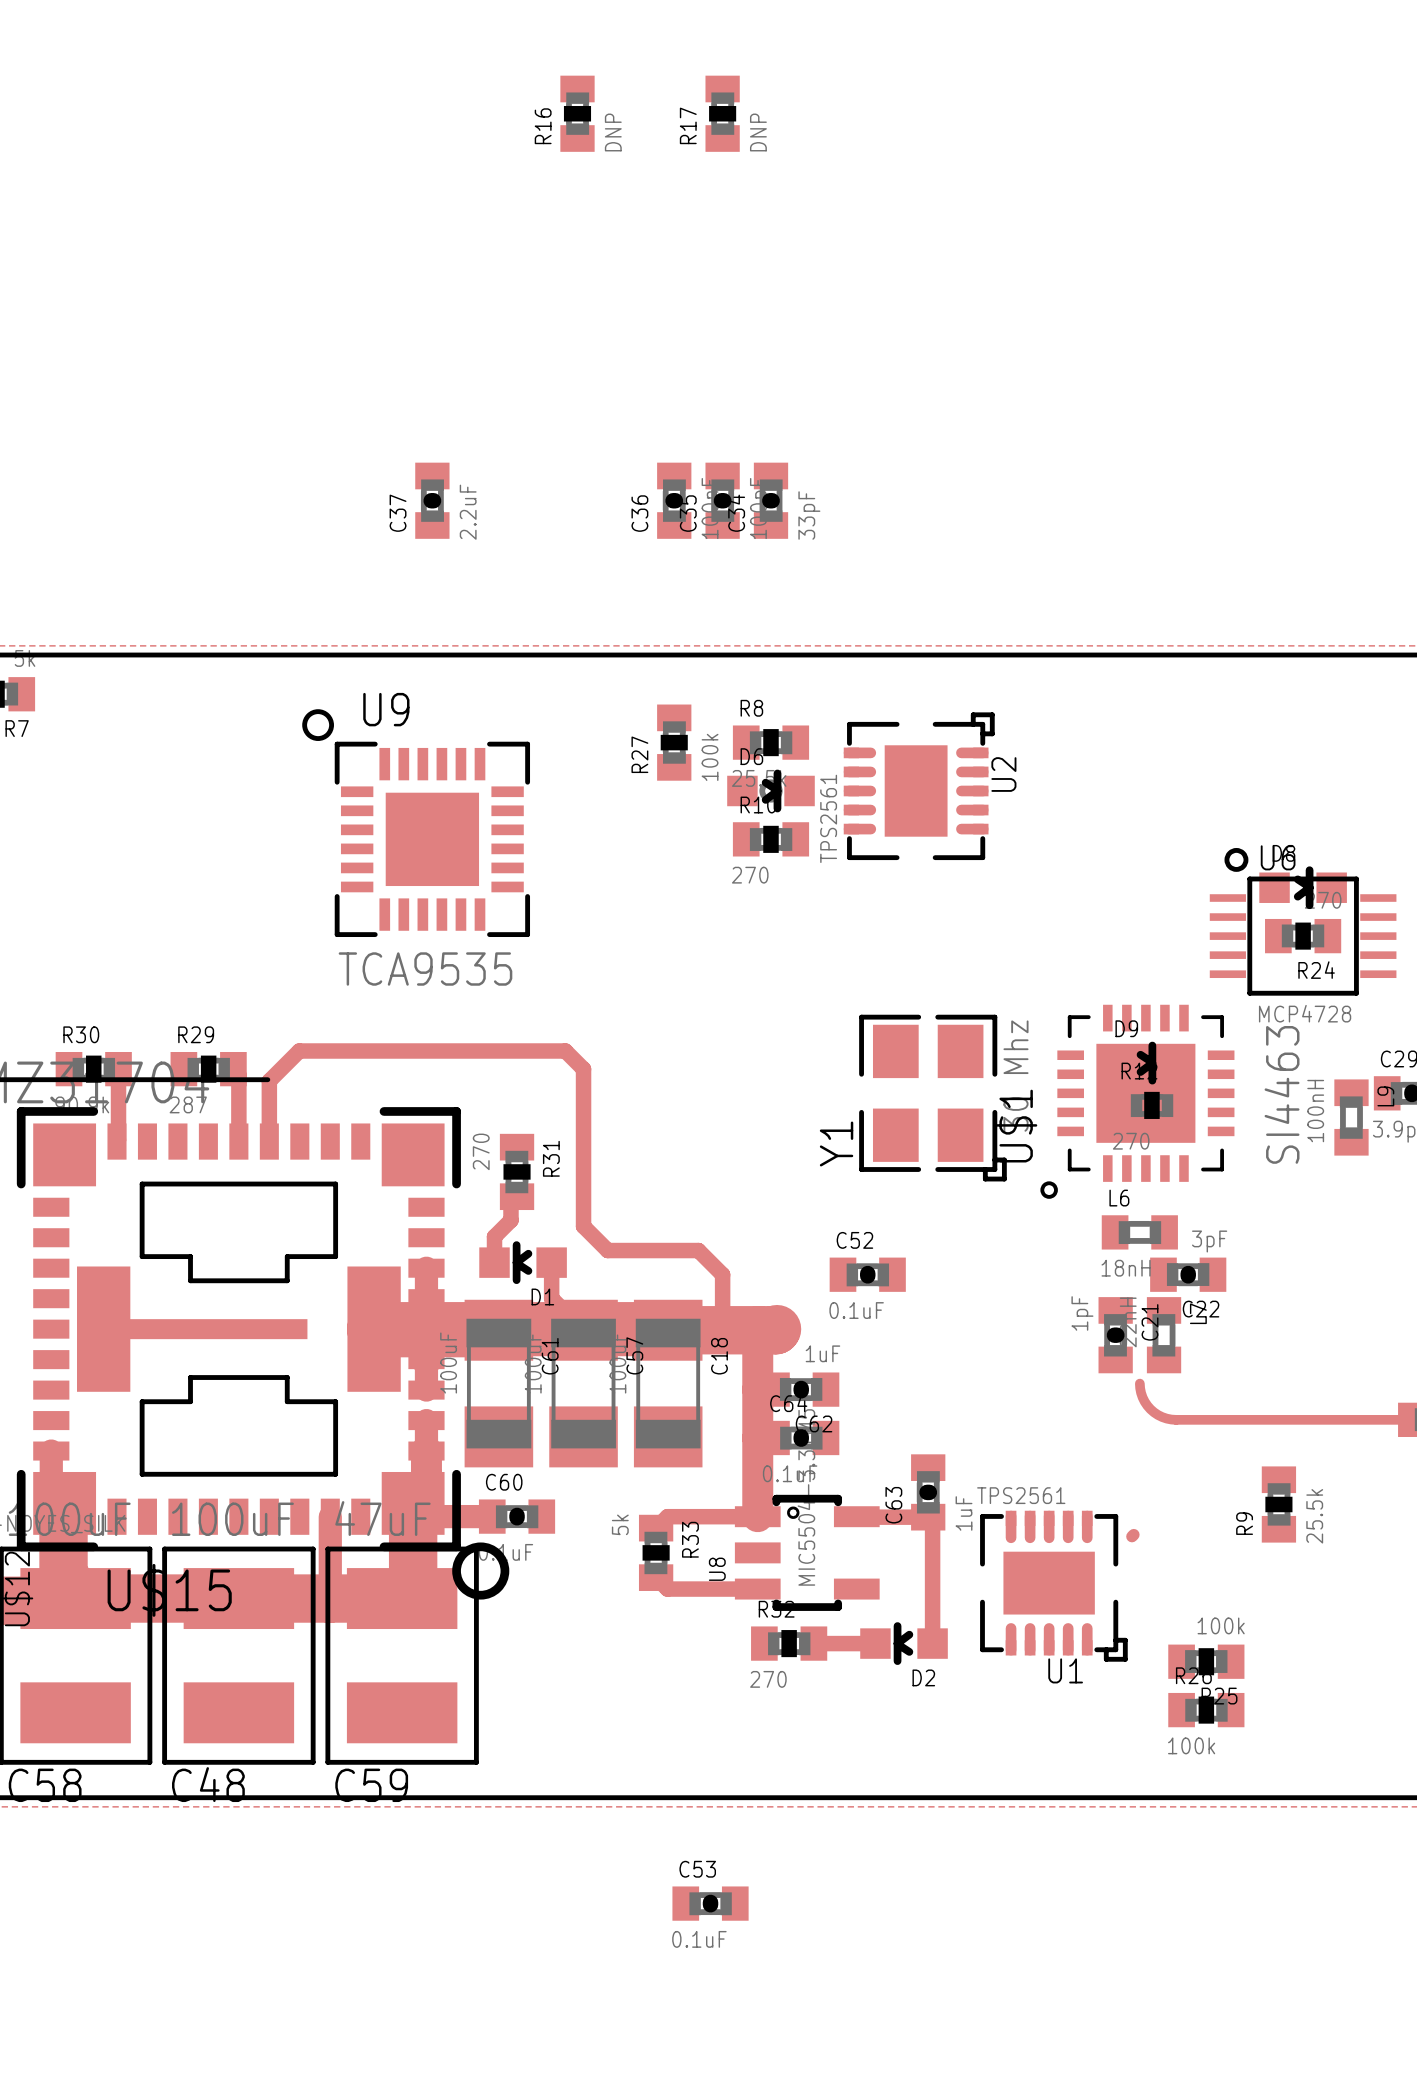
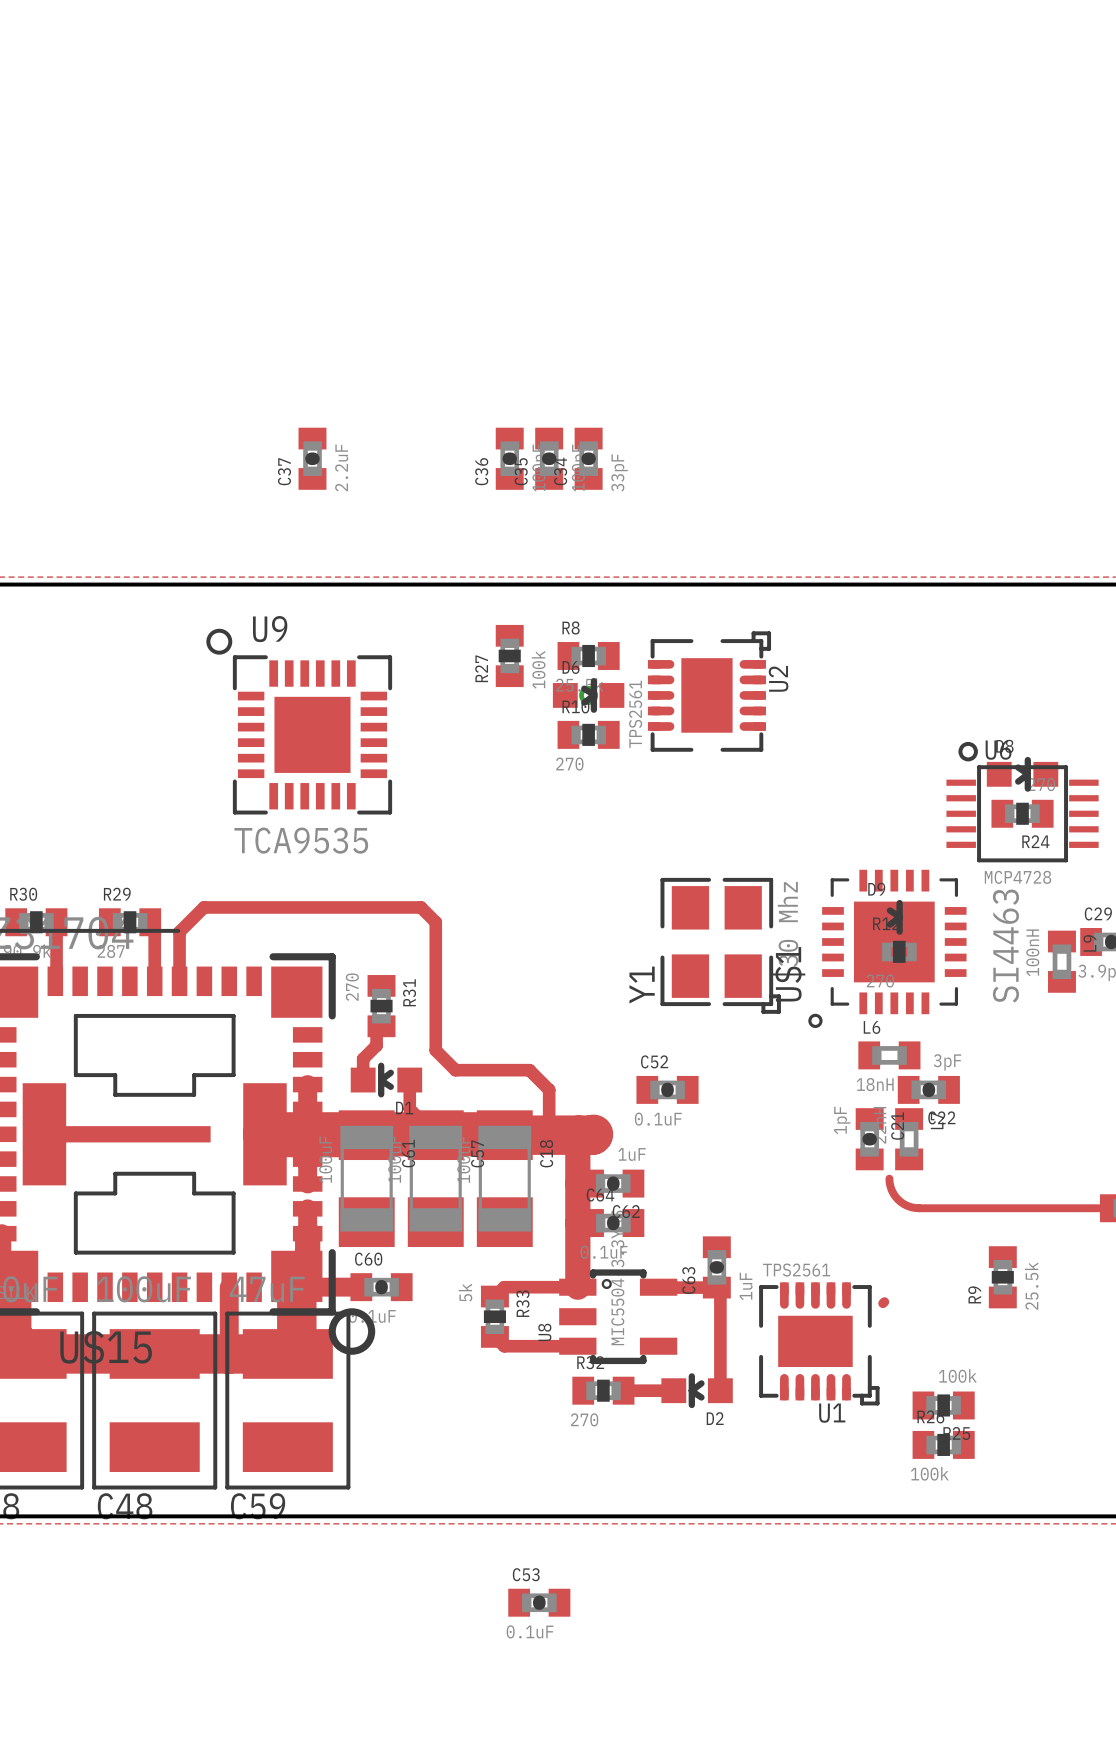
R16: DNP (577, 113) -> none
R17: DNP (722, 113) -> none

